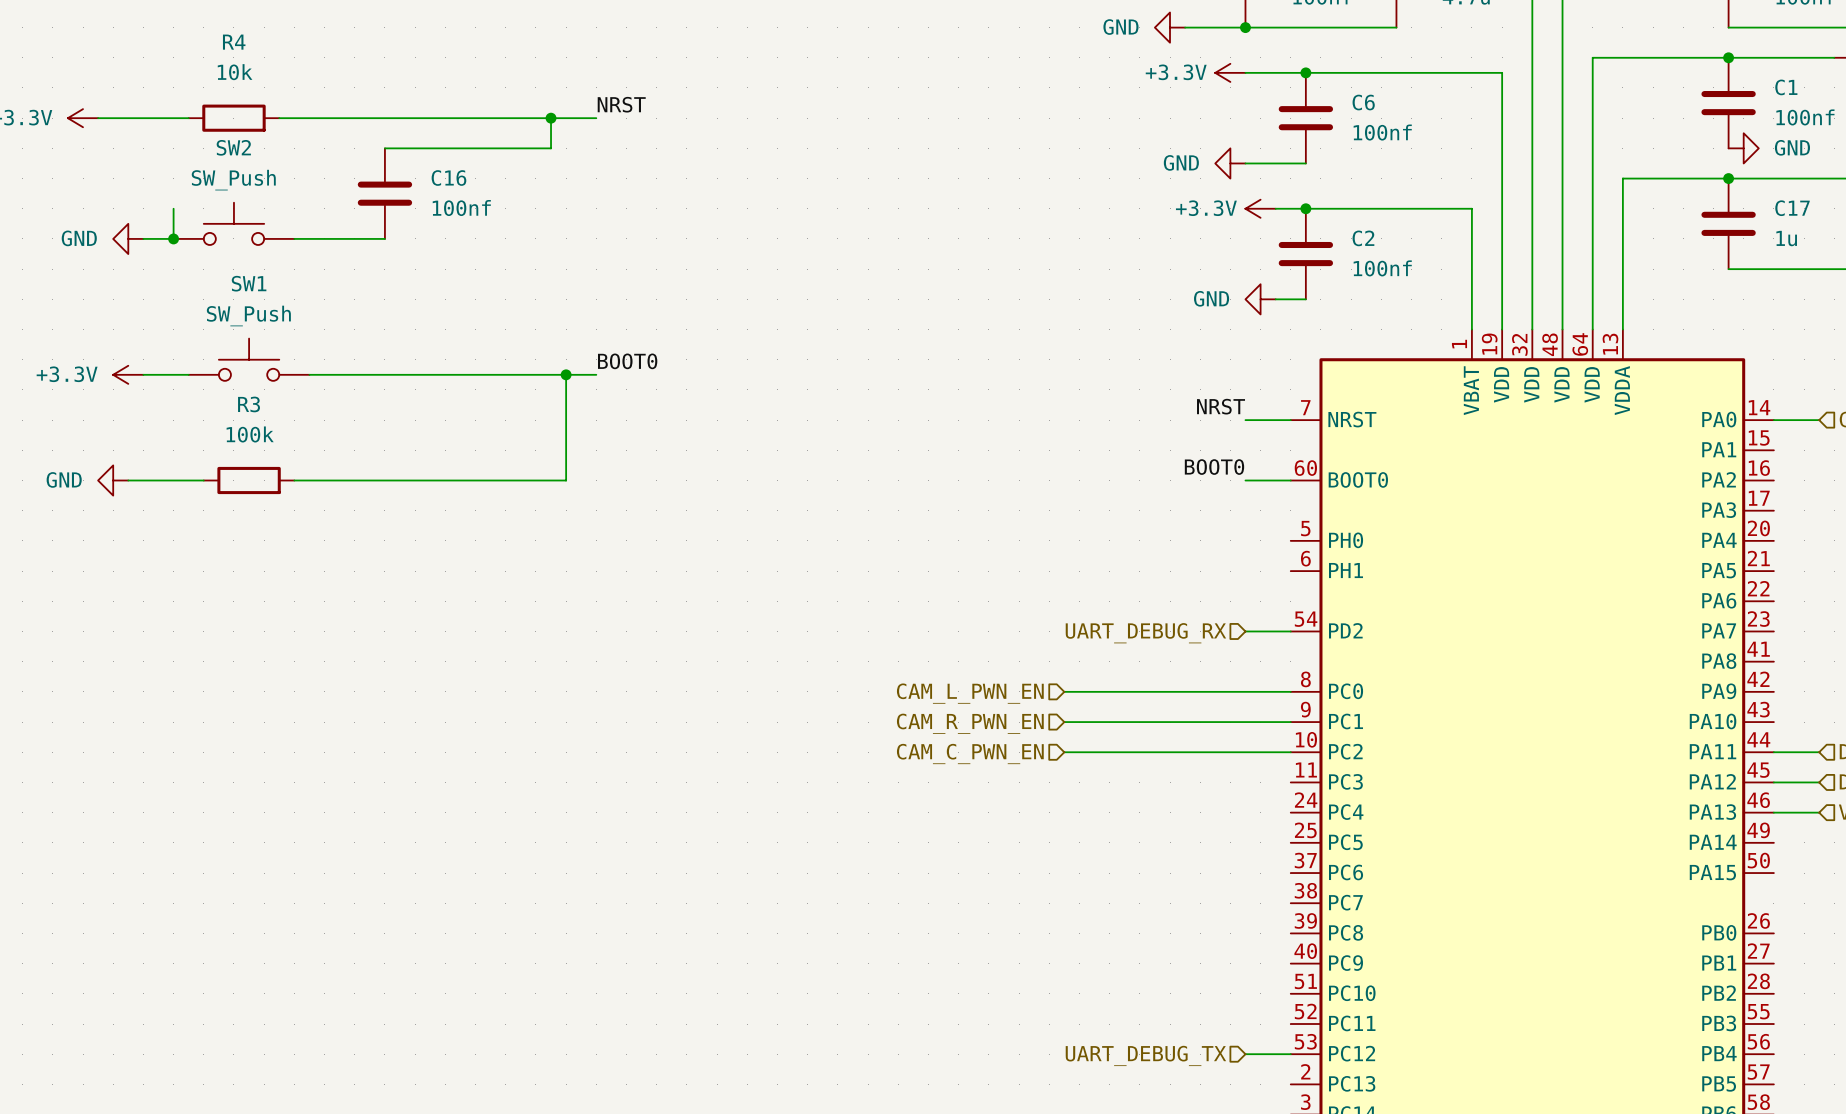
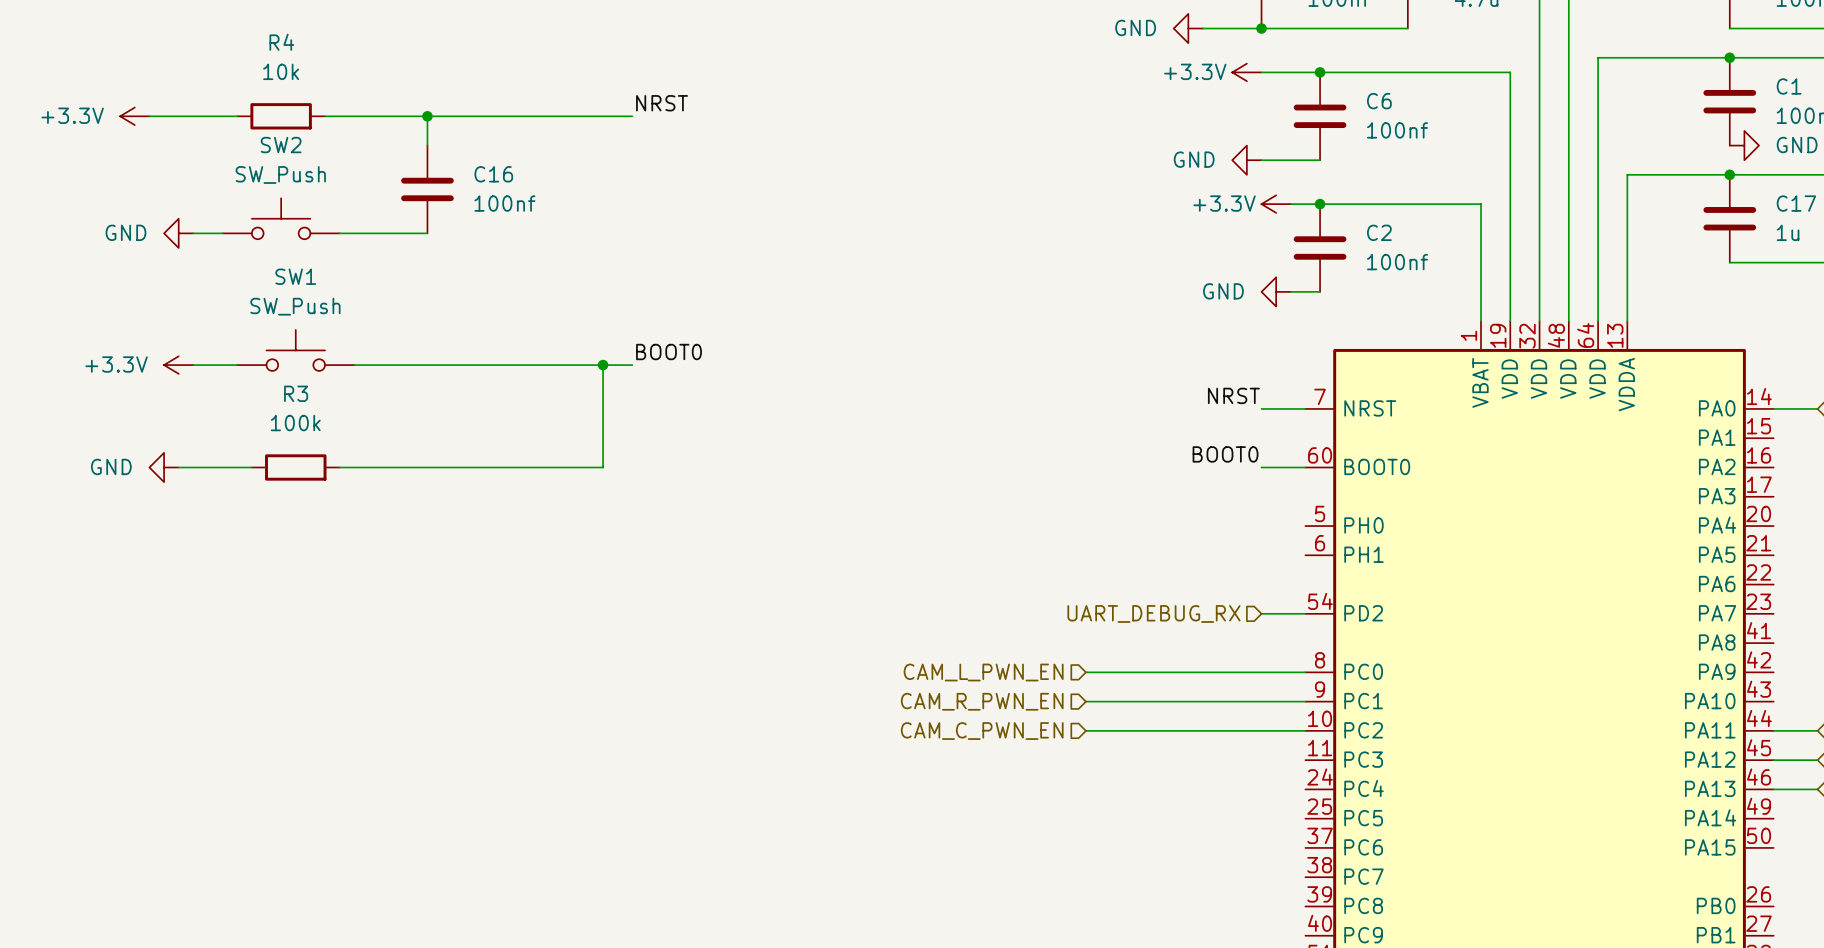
junction: none -> (427, 116)
wire: (551, 118) (551, 148) (384, 148) -> (427, 116) (427, 145)
junction: (551, 118) -> none
wire: (173, 208) (173, 238) -> none
junction: (173, 238) -> none

